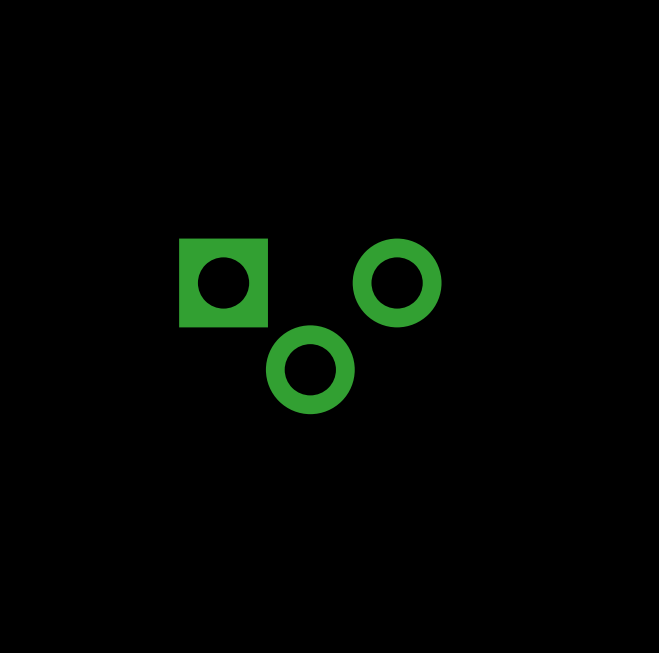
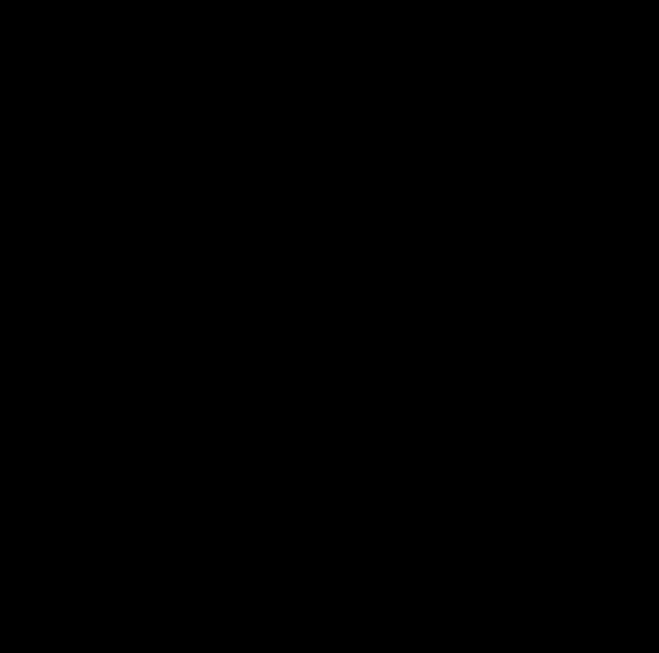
part: (310, 326) -> none

